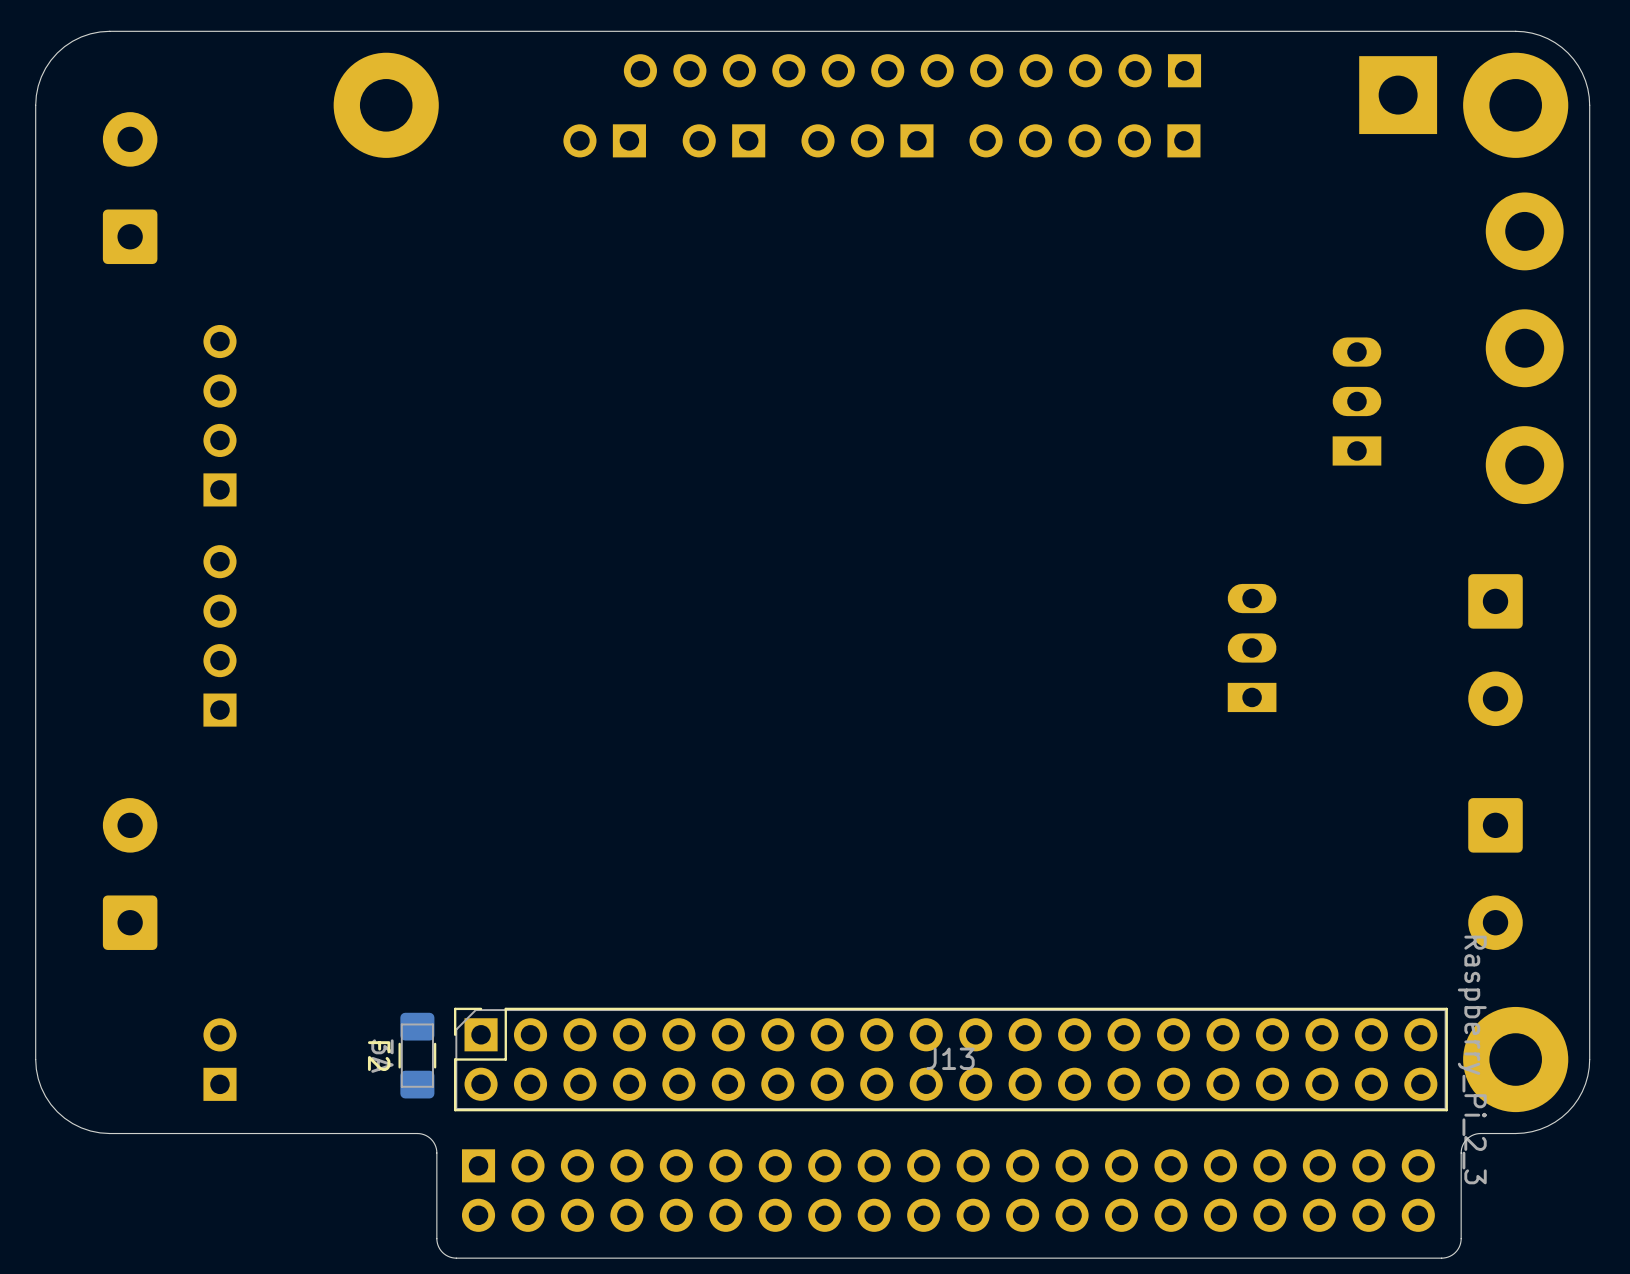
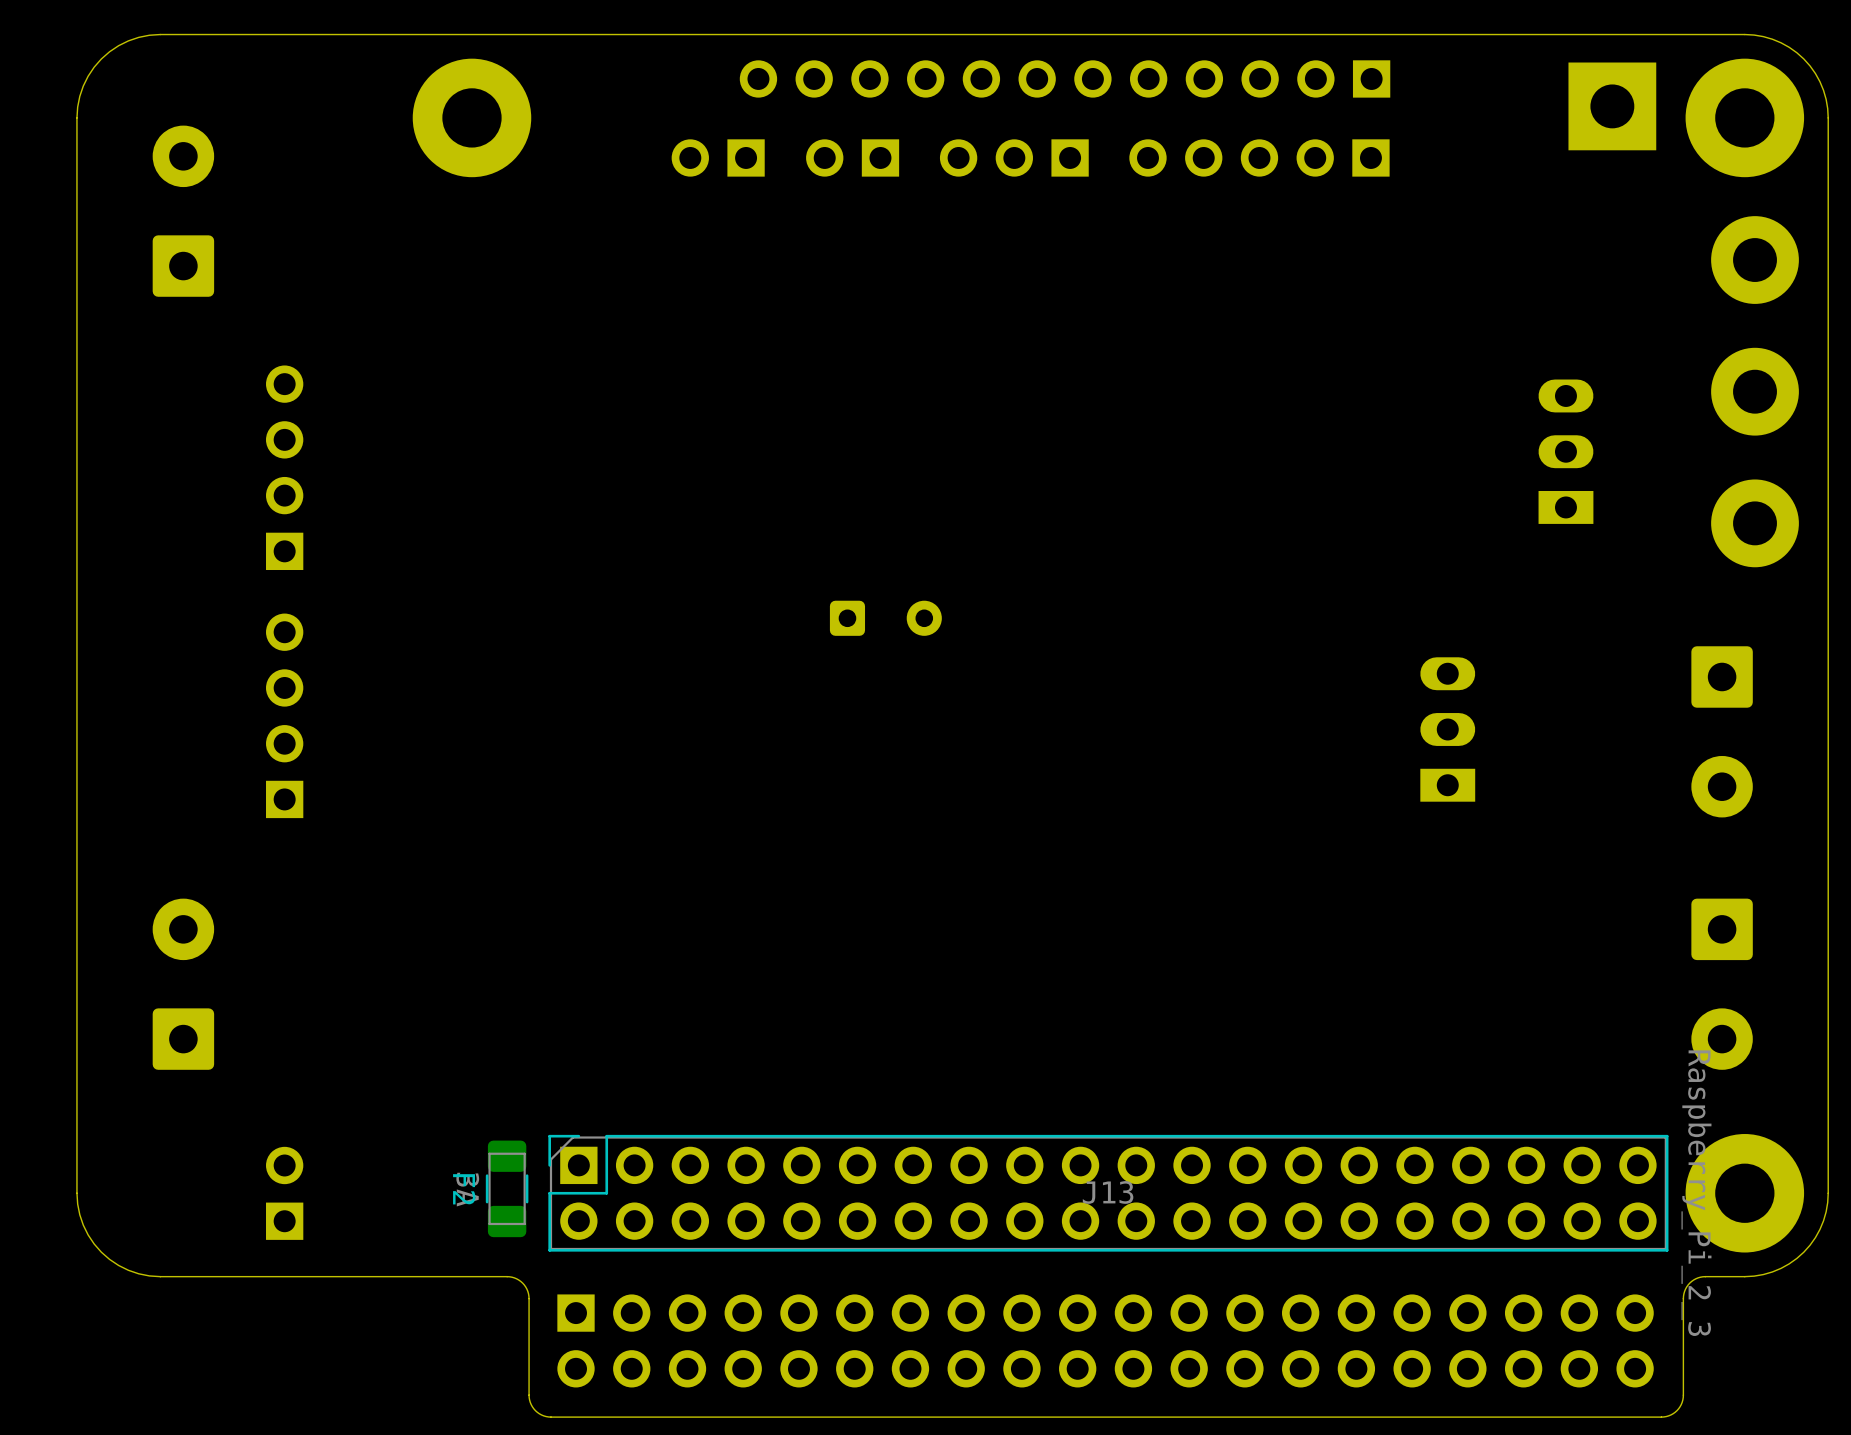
part: none -> (885, 618)

